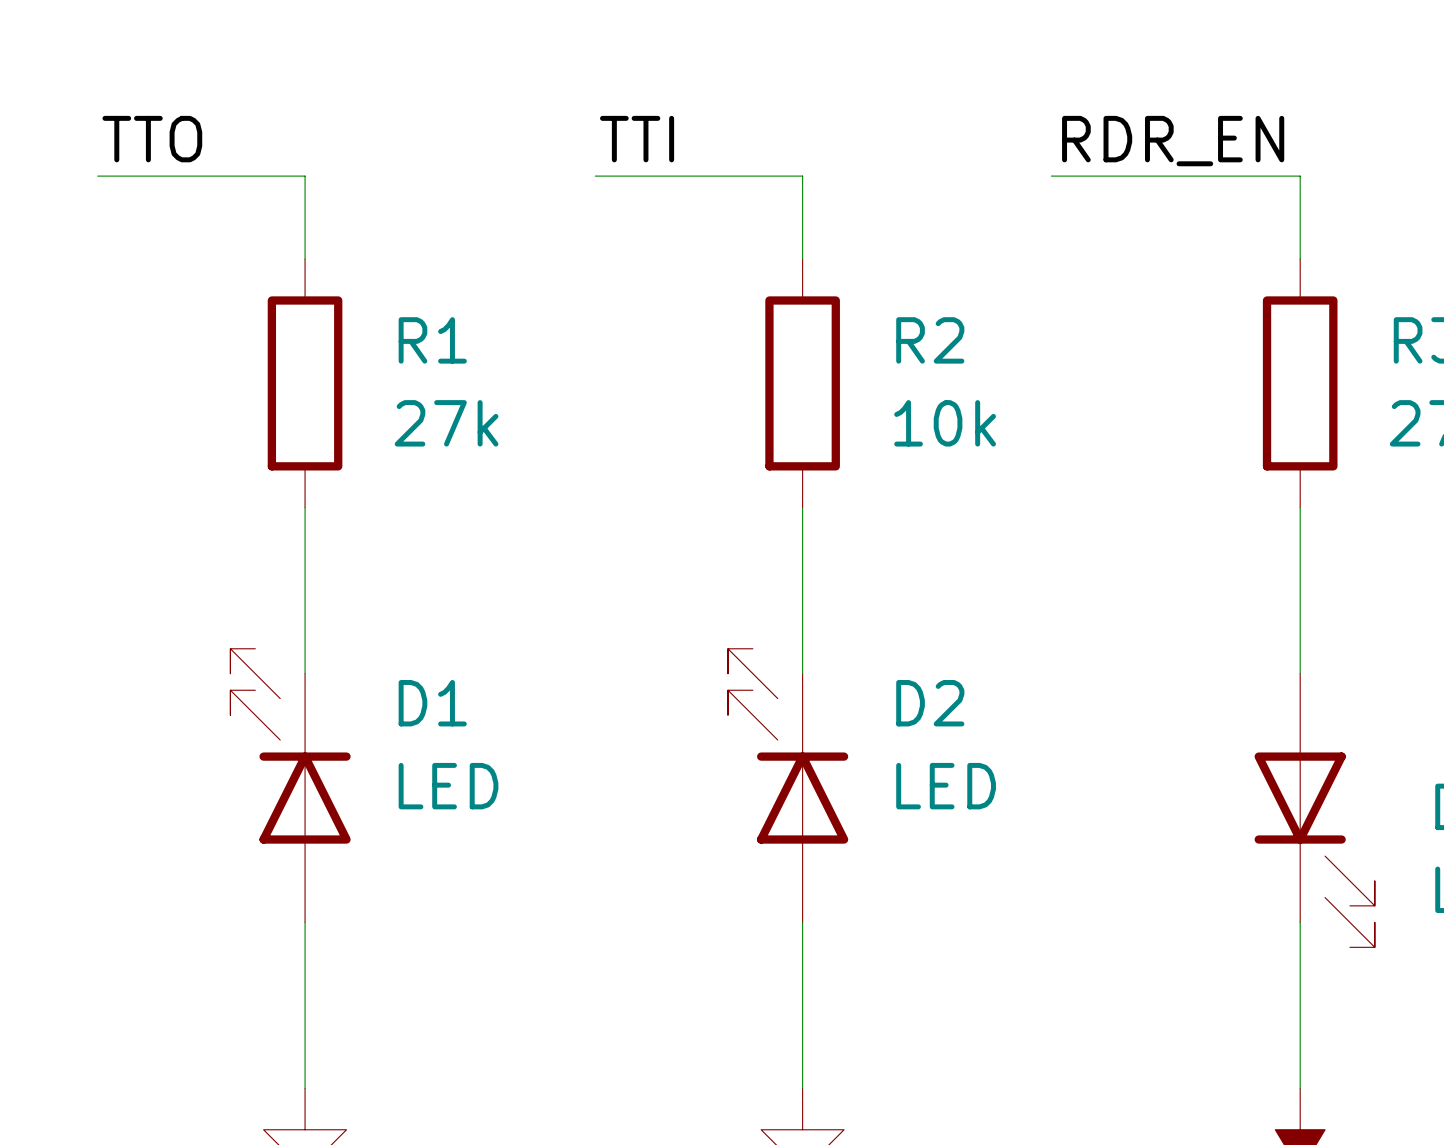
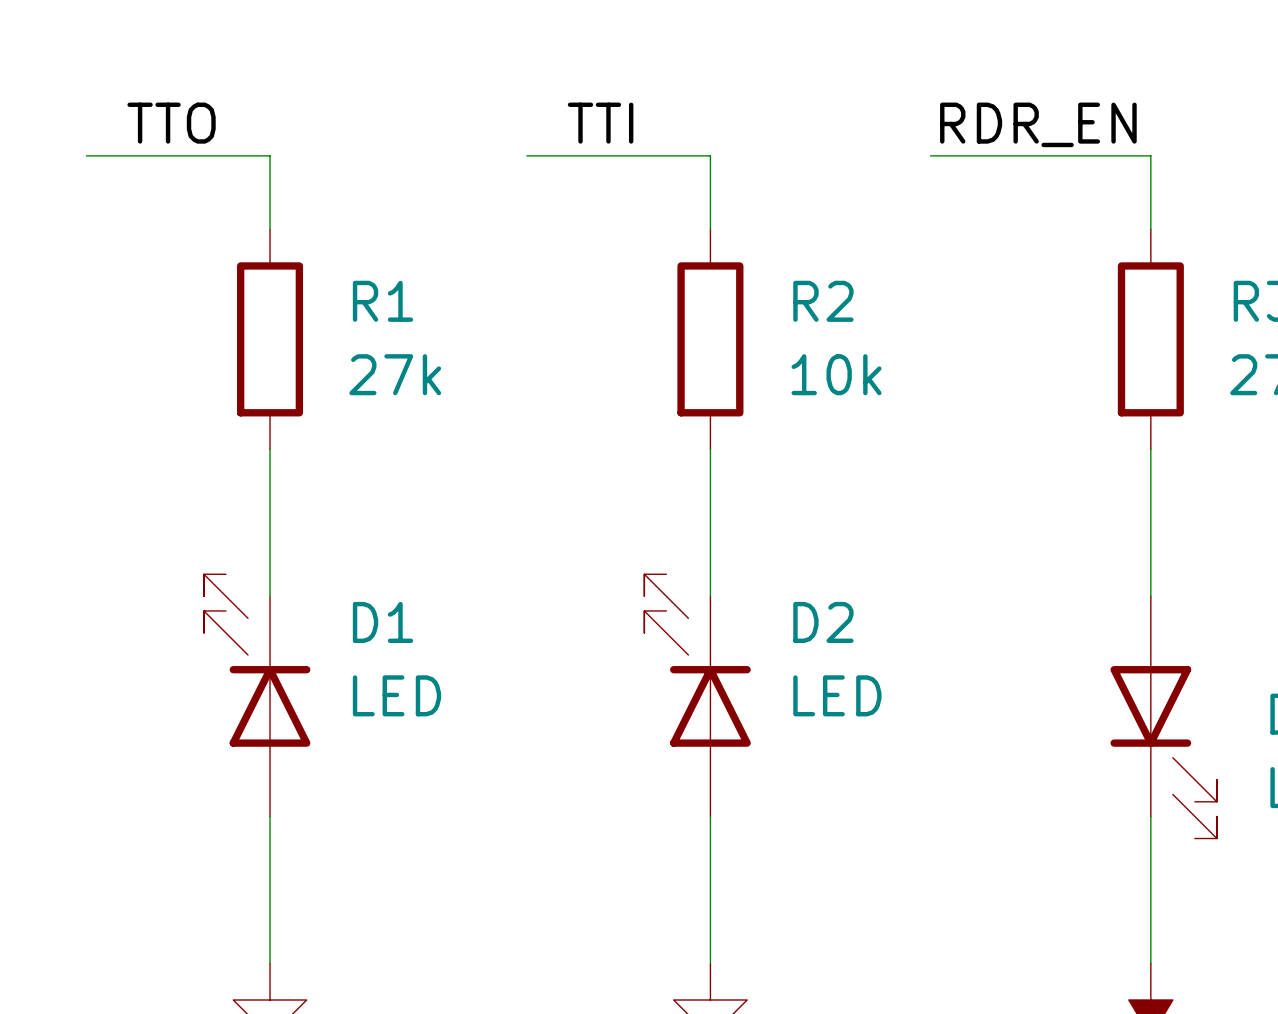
label position: TTO (152, 139) -> TTO (171, 123)
label position: TTI (637, 139) -> TTI (600, 123)

